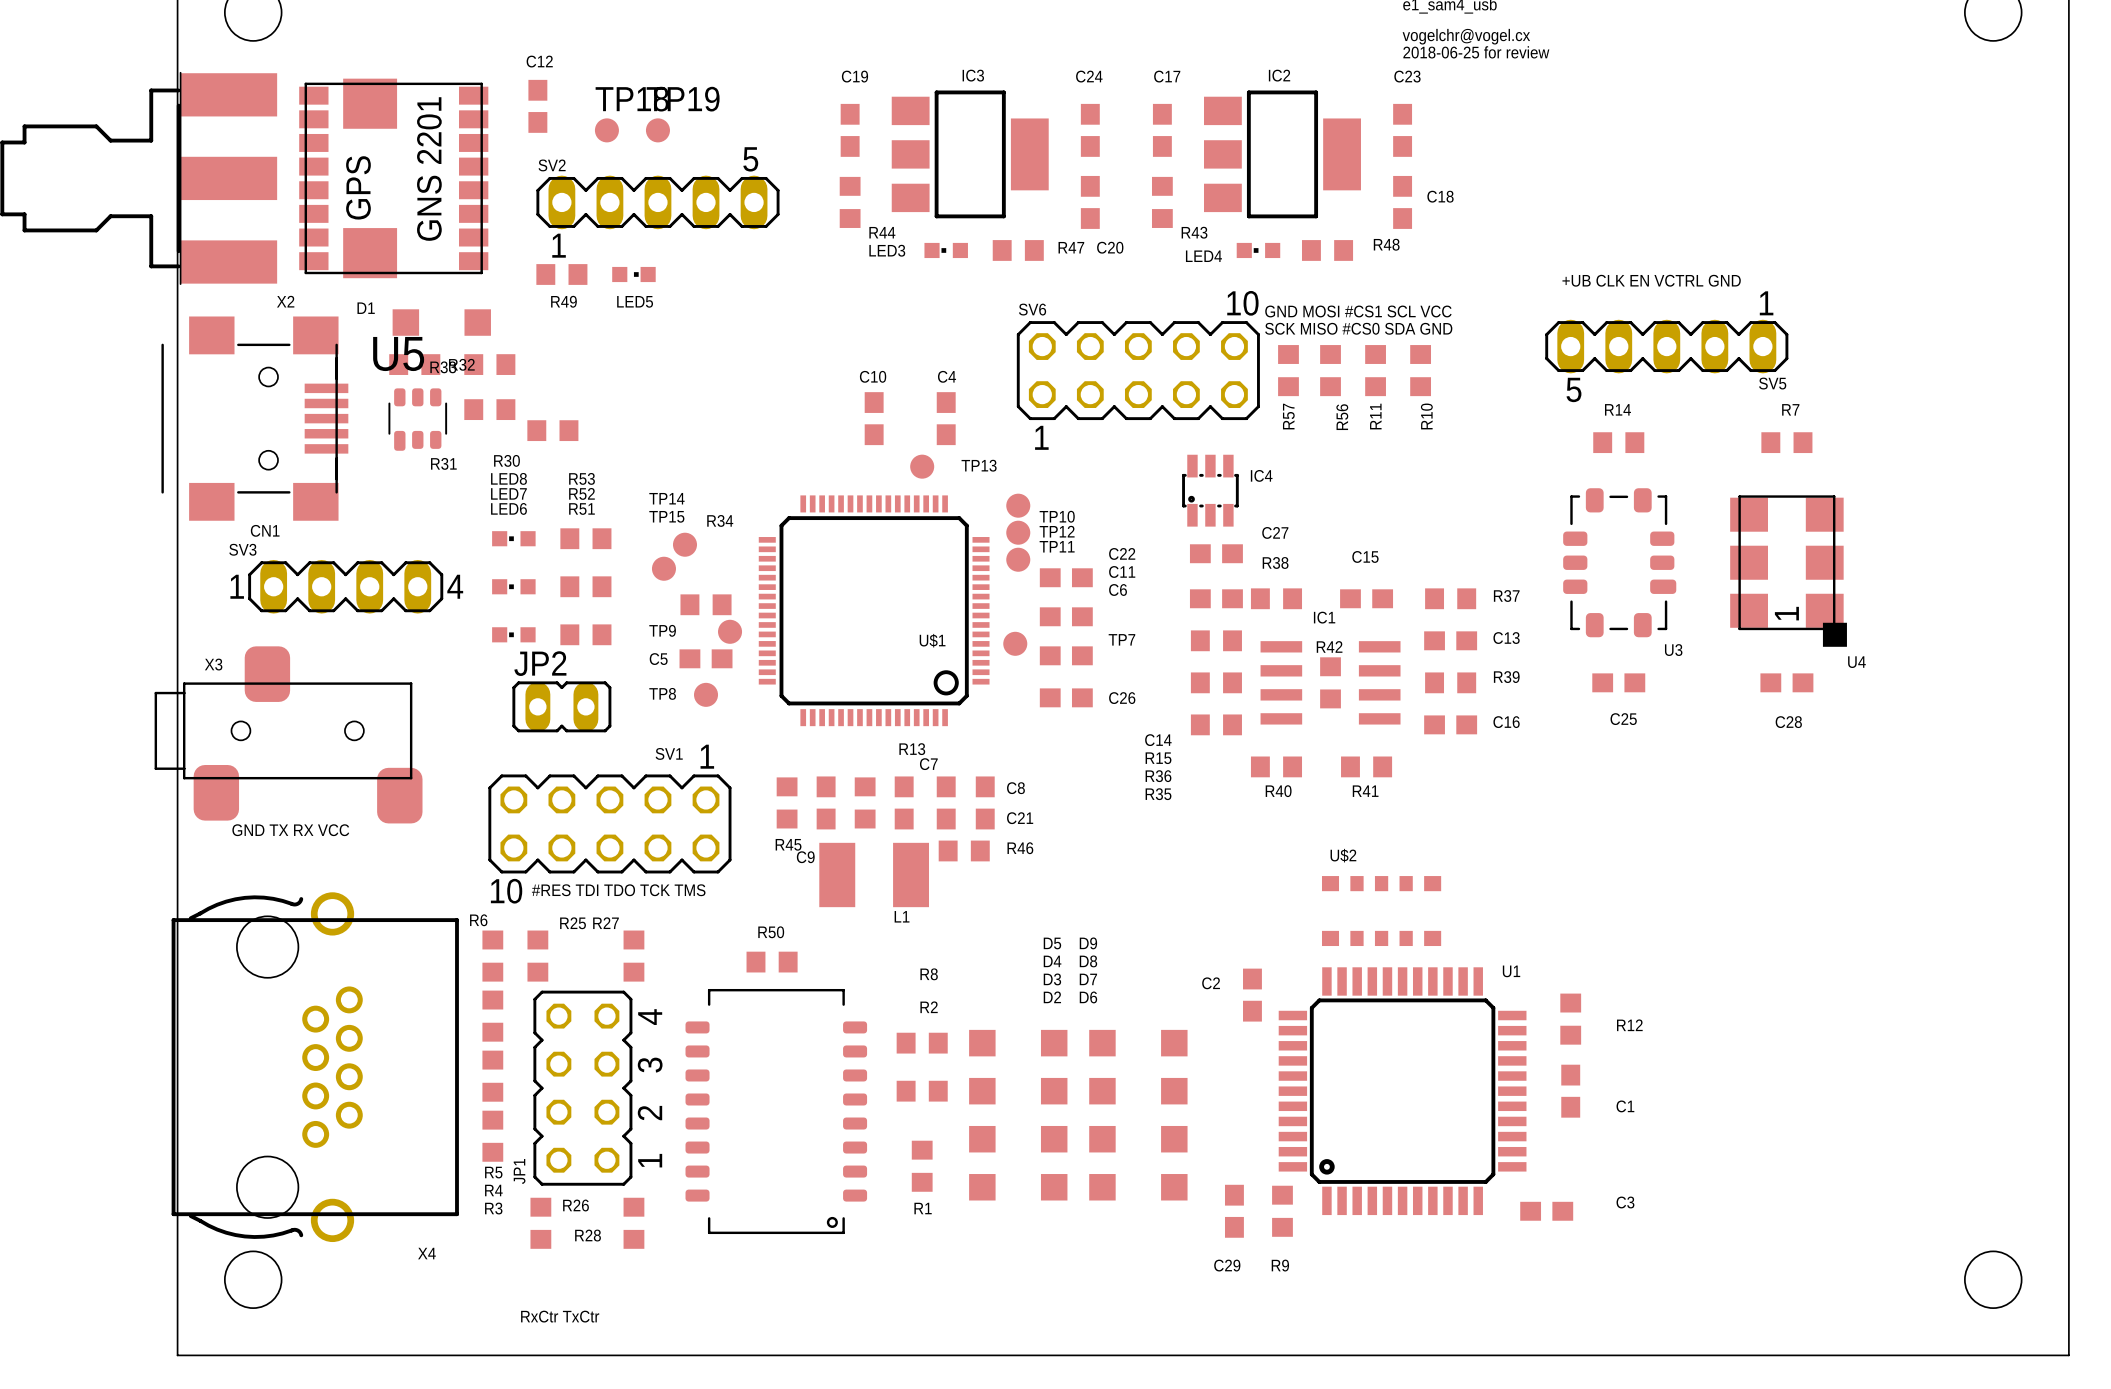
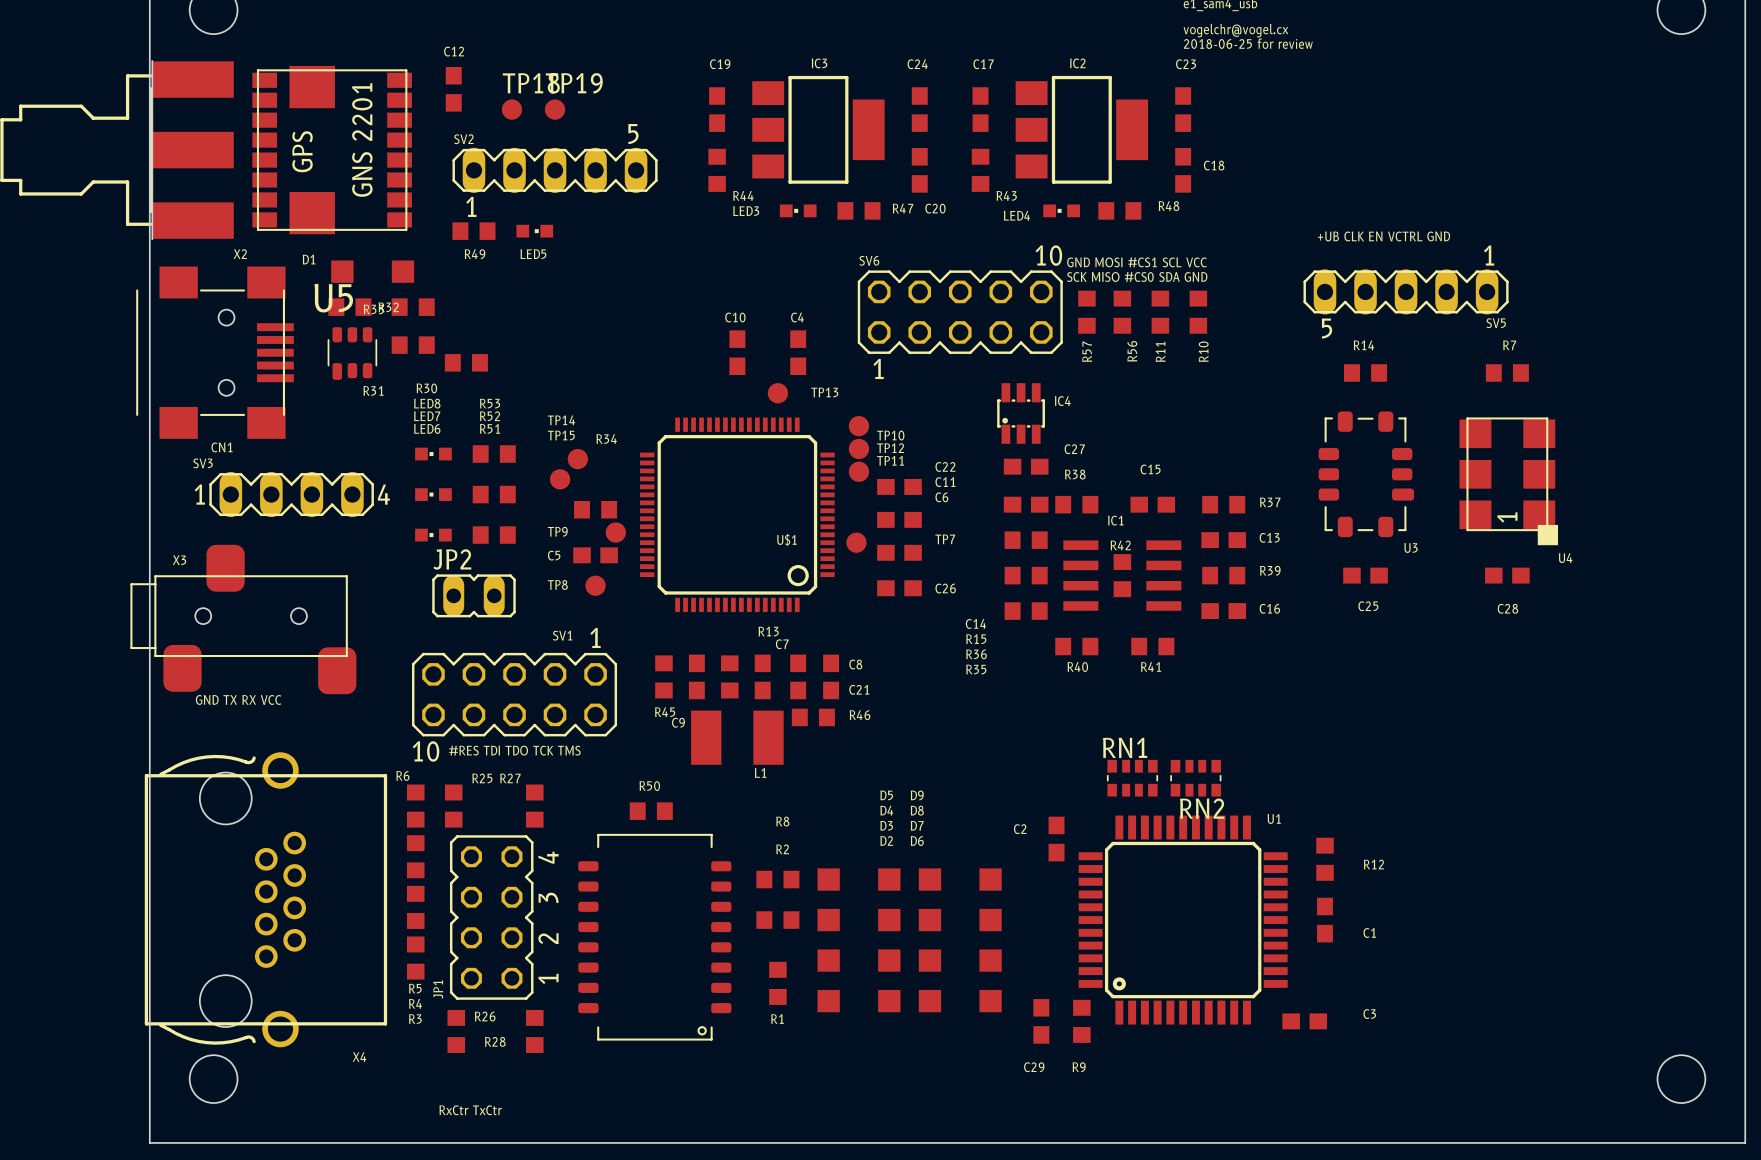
U$2: (1381, 911) -> none
RN1: none -> (1132, 778)
RN2: none -> (1195, 778)

